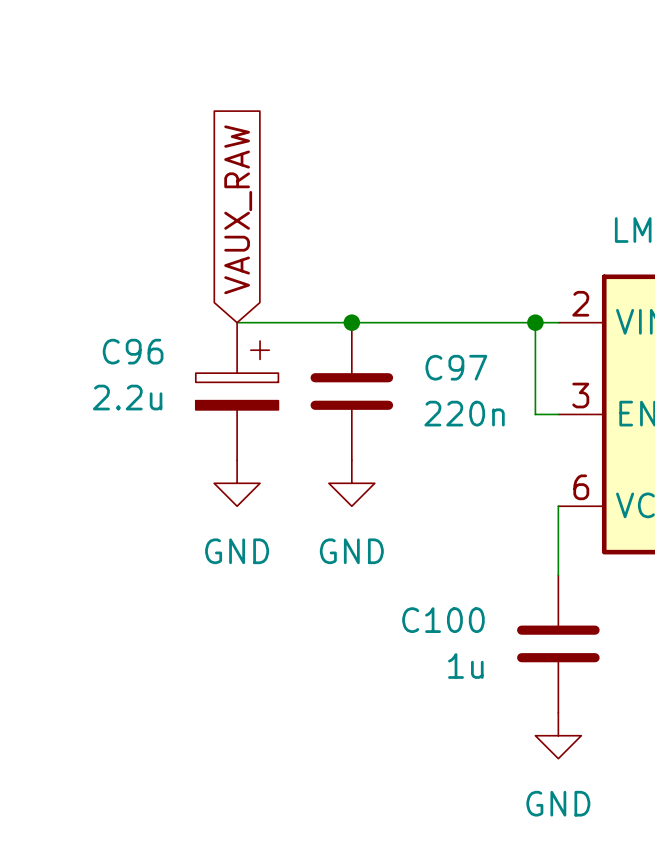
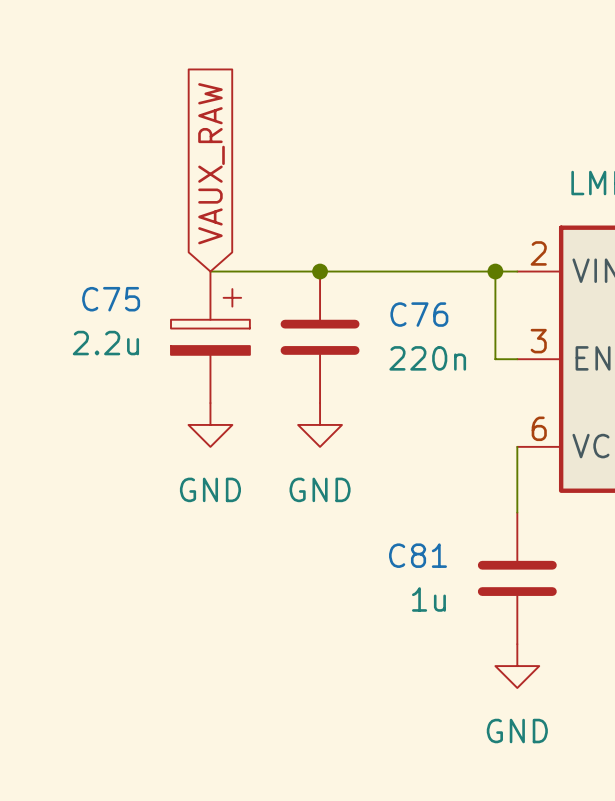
C96 name: C96 (133, 351) -> C75 (111, 299)
C97 name: C97 (456, 367) -> C76 (419, 314)
C100 name: C100 (443, 620) -> C81 (418, 555)

